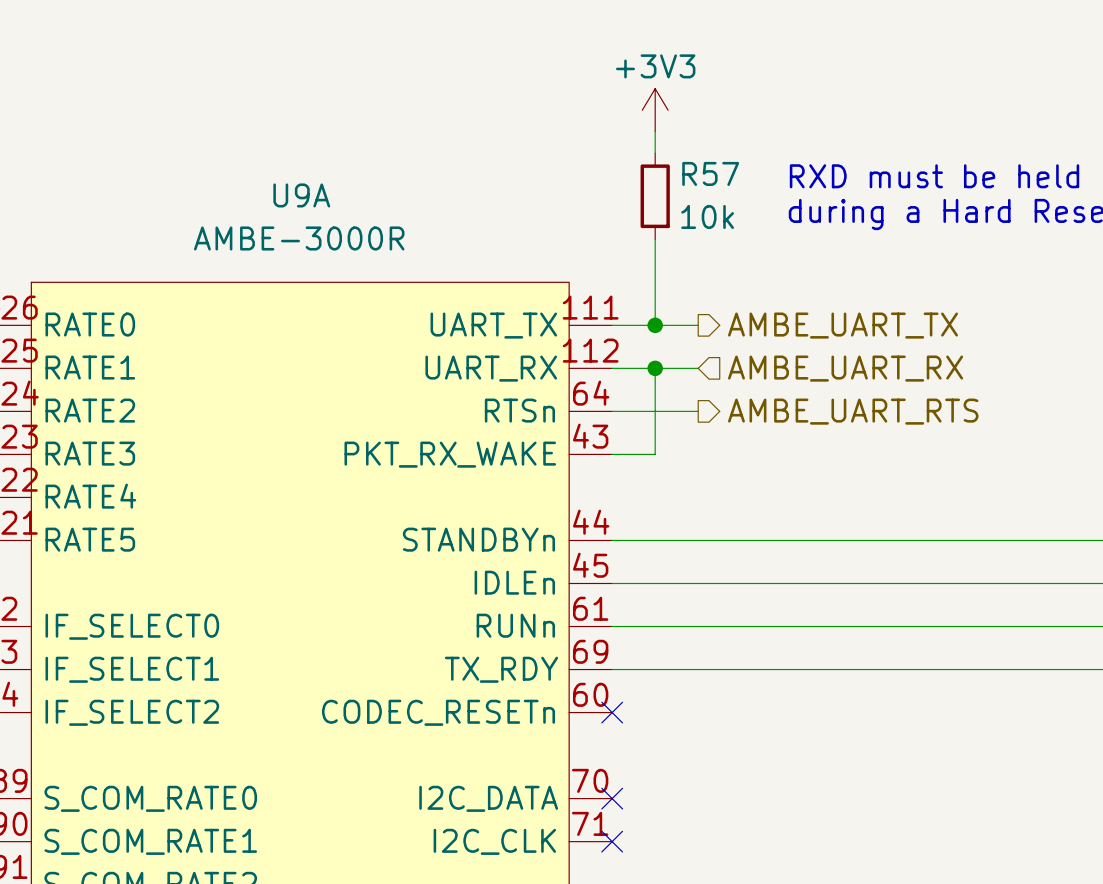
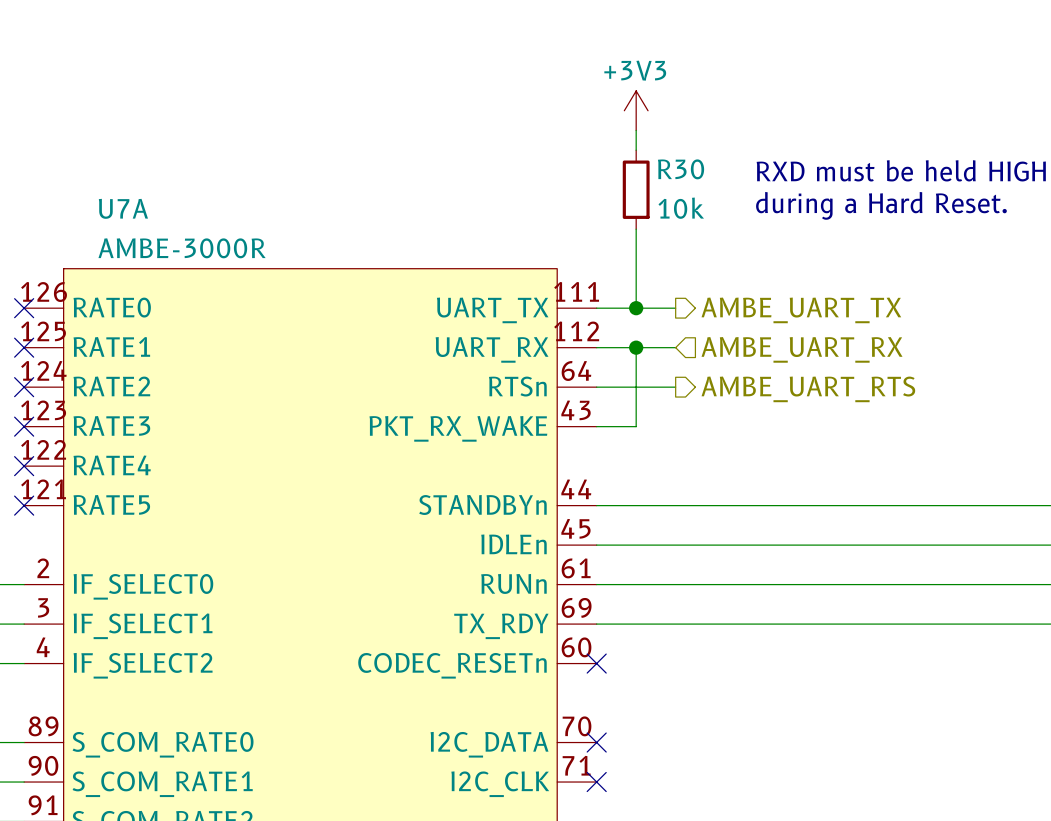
R57 name: R57 (710, 173) -> R30 (681, 169)
U9A name: U9A (301, 195) -> U7A (123, 208)
U9A value position: AMBE-3000R (299, 238) -> AMBE-3000R (182, 248)

